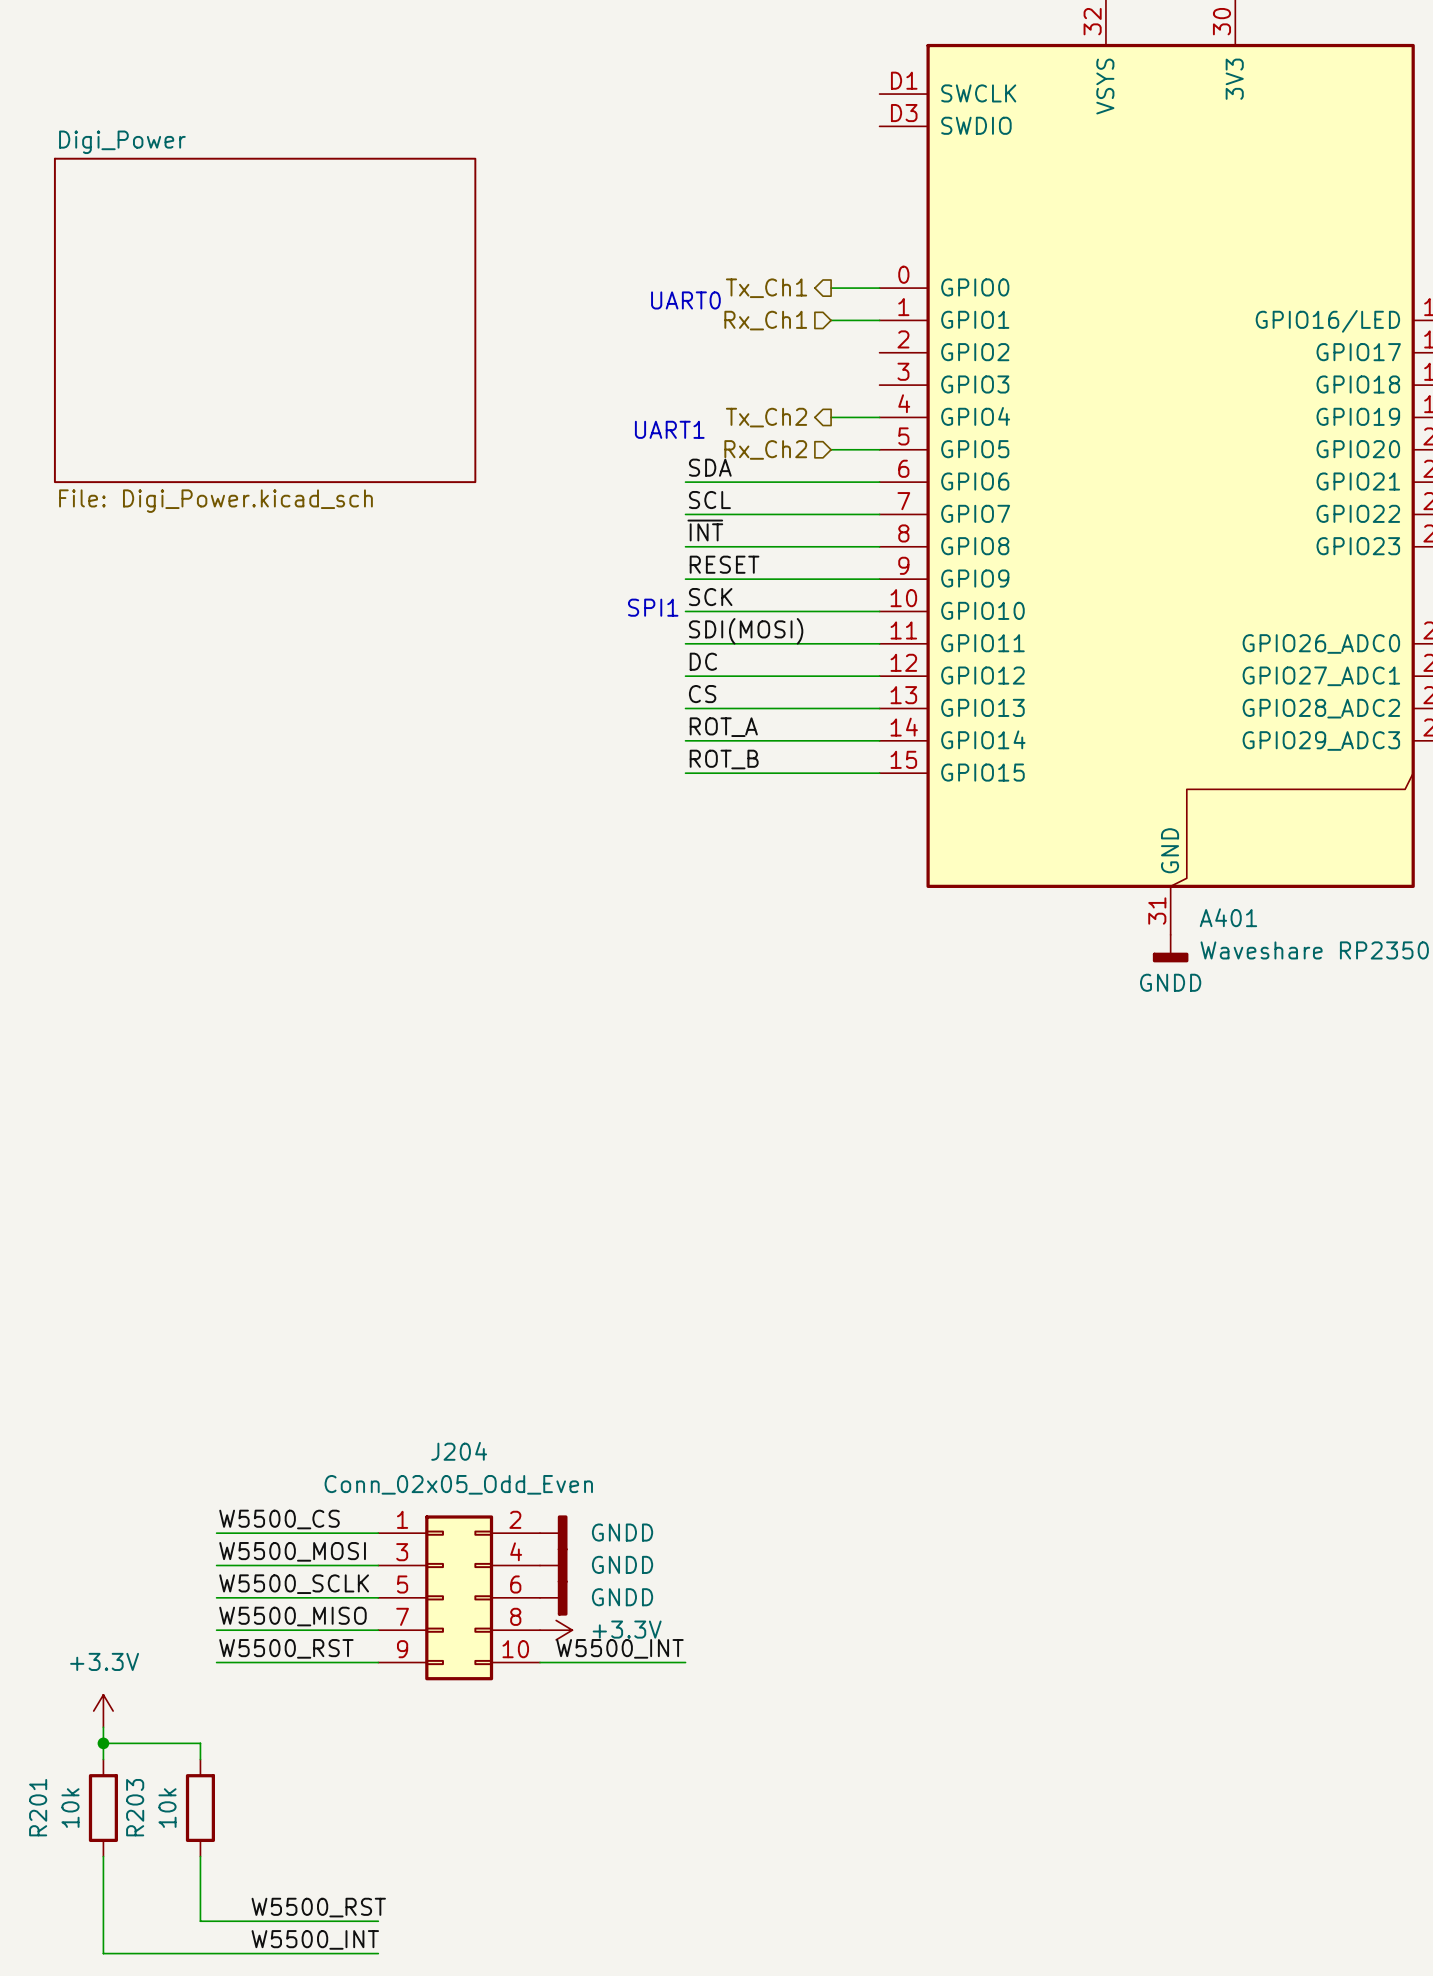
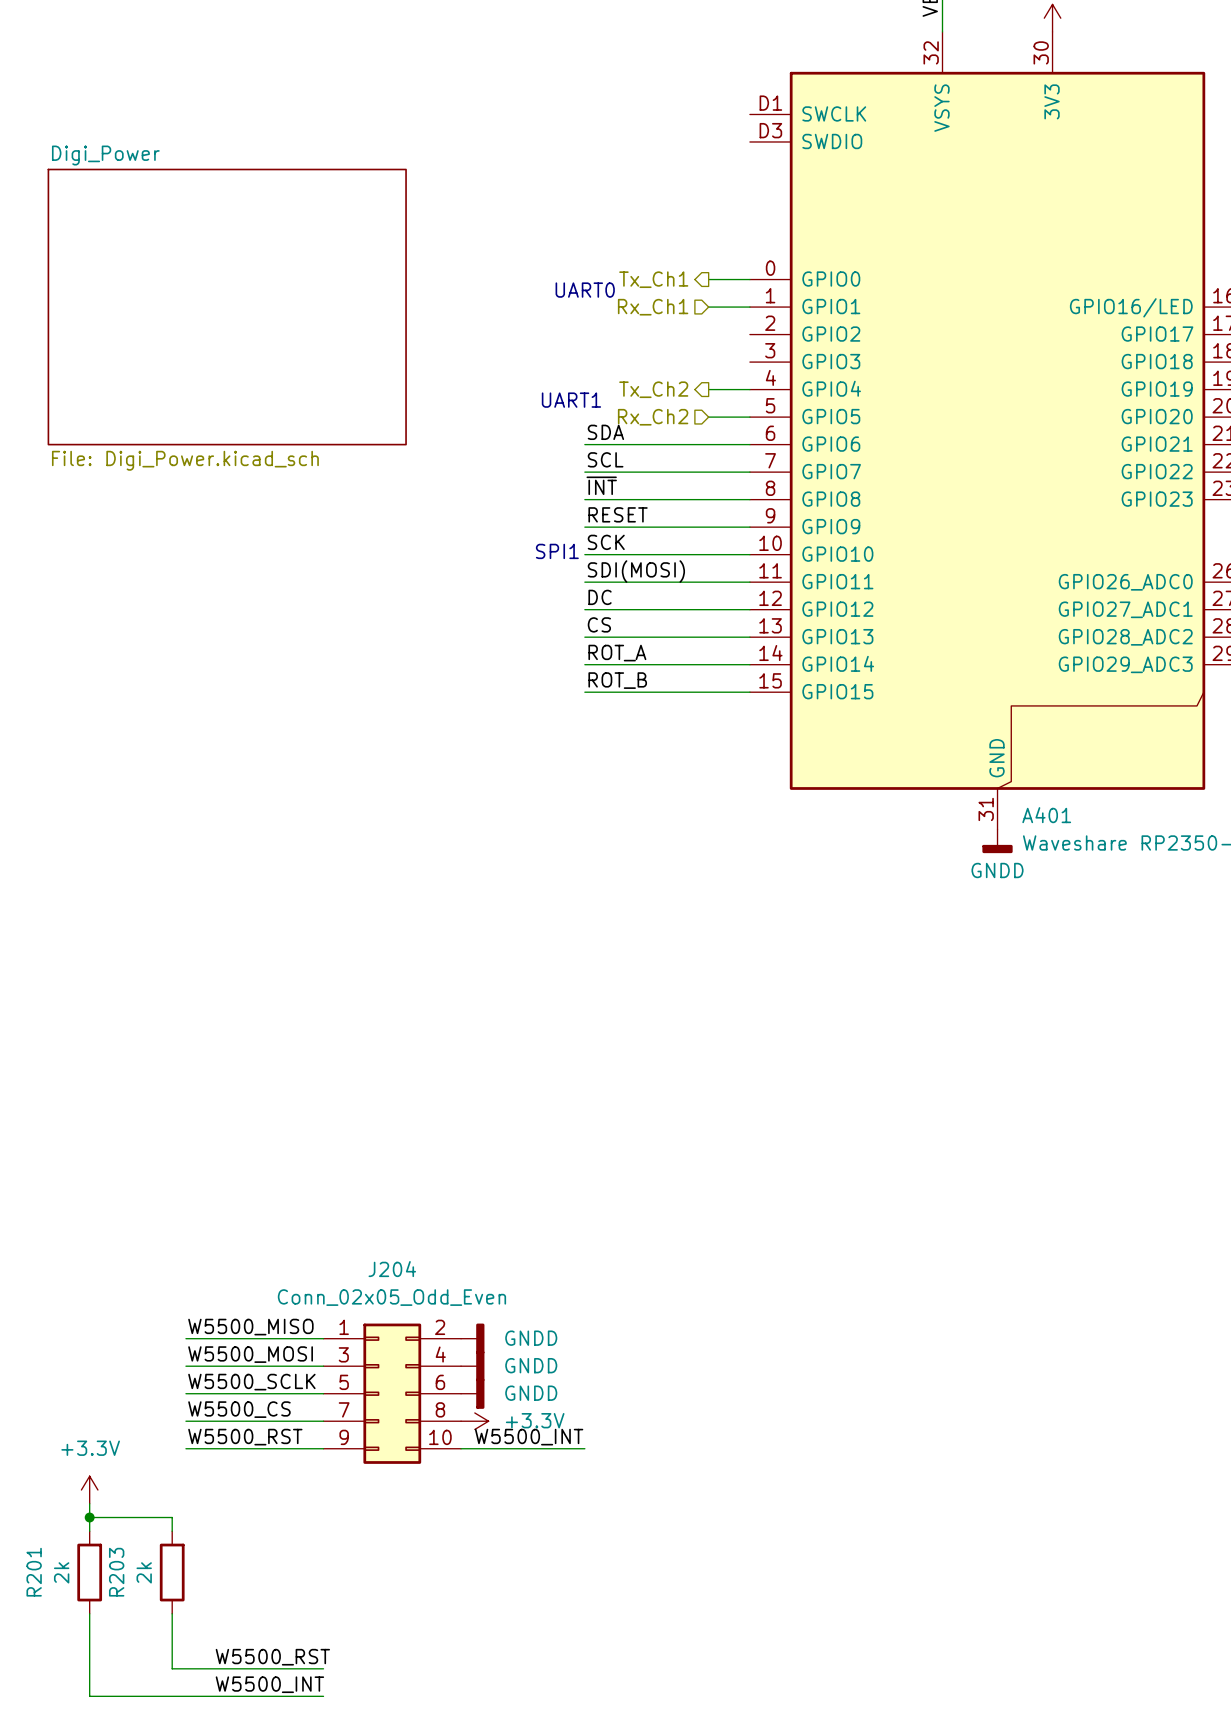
label: W5500_CS (279, 1519) -> W5500_MISO (250, 1327)
label: W5500_MISO (292, 1616) -> W5500_CS (239, 1409)
R201 value: 10k (70, 1808) -> 2k (61, 1572)
R203 value: 10k (167, 1808) -> 2k (144, 1572)

